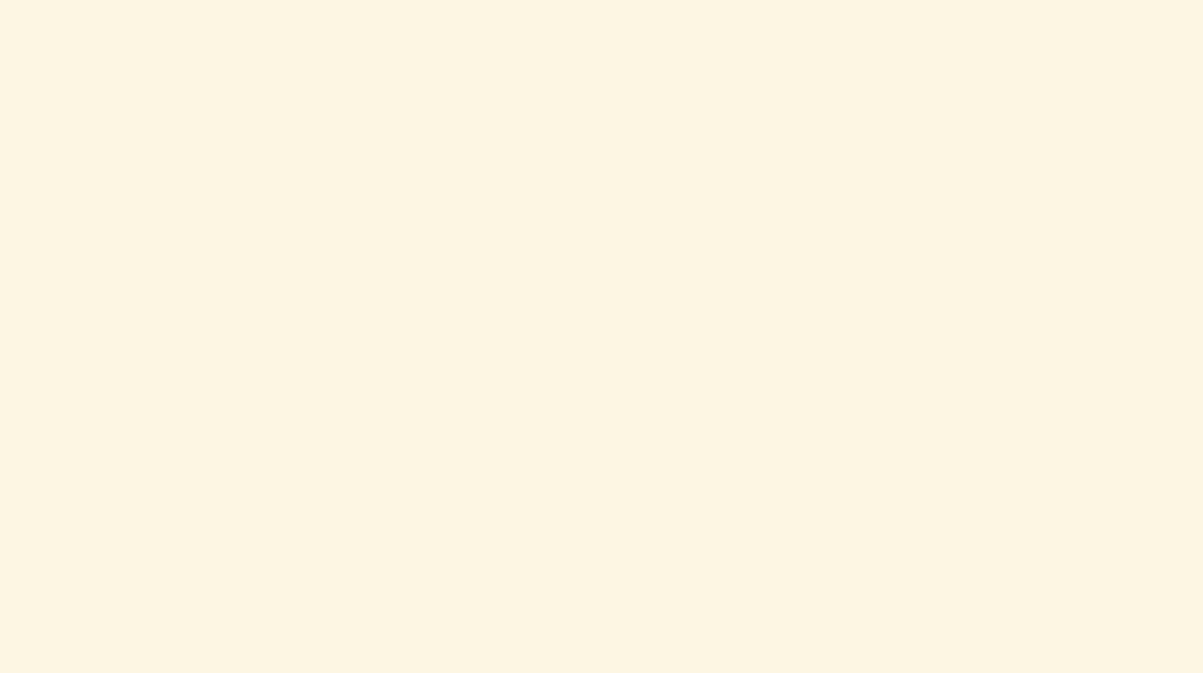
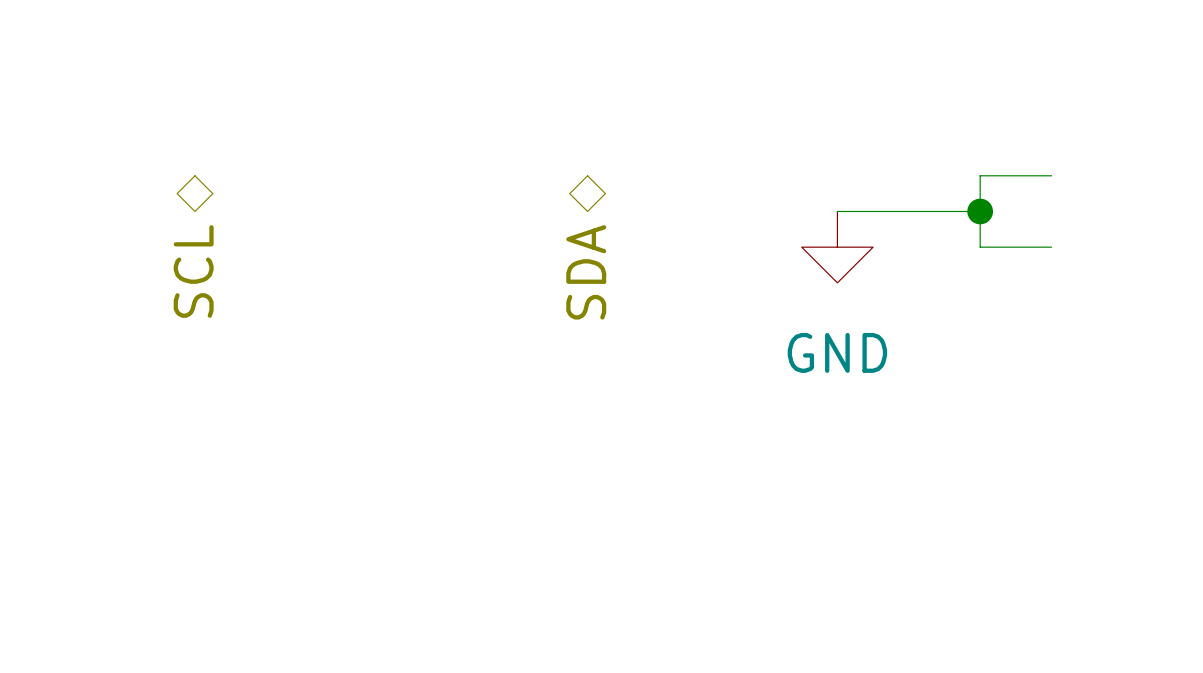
wire: none -> (1051, 175) (980, 175) (980, 247) (1051, 247)
wire: none -> (837, 211) (980, 211)
junction: none -> (980, 211)
power symbol: none -> GND (837, 247)
hierarchical label: none -> SCL (193, 271)
hierarchical label: none -> SDA (586, 272)

